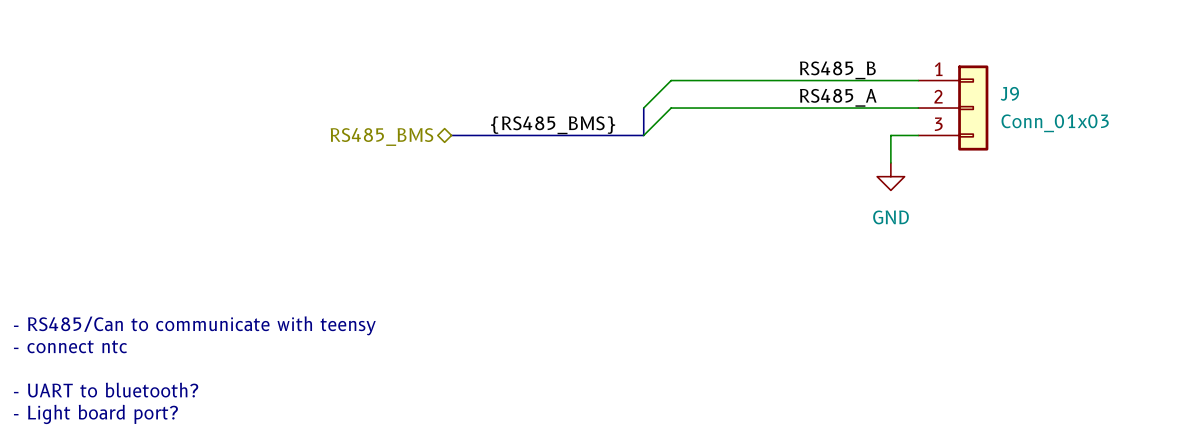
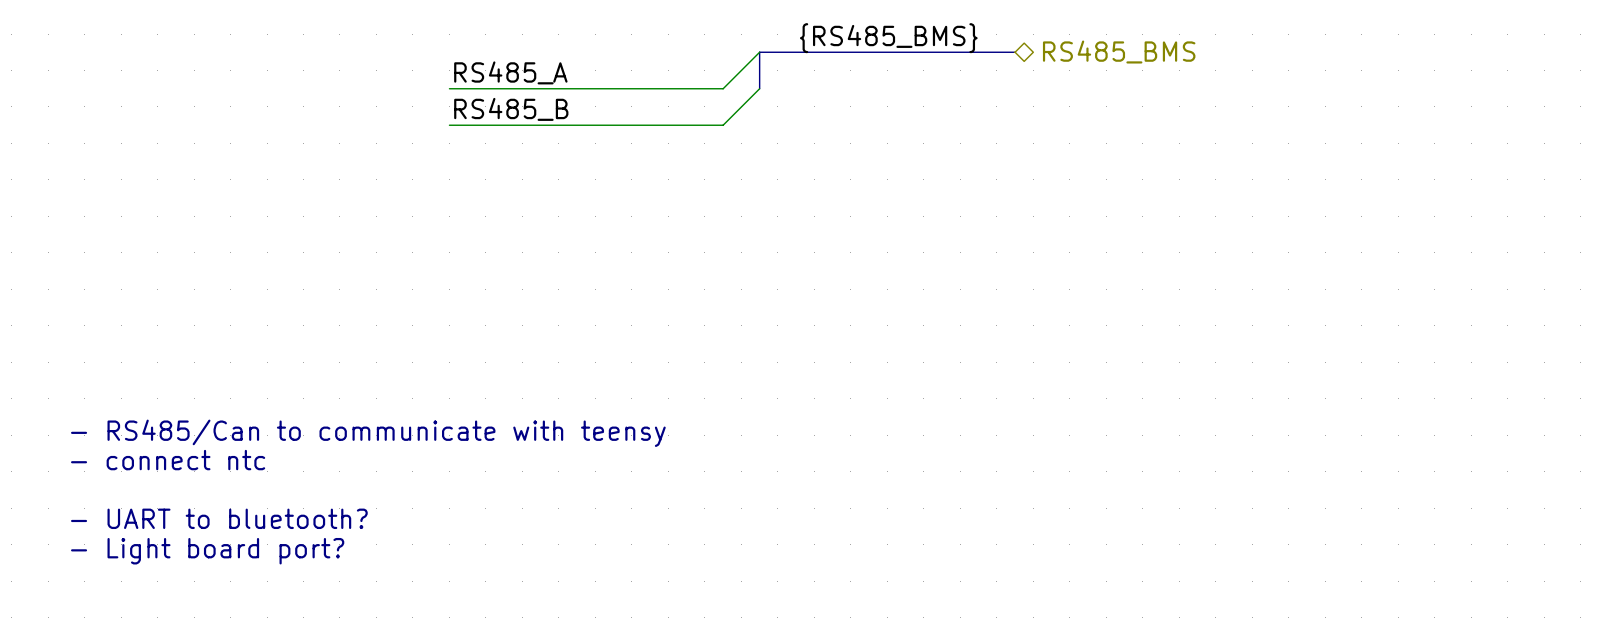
wire: none -> (759, 52) (723, 88) (449, 88)
bus: none -> (1015, 52) (759, 52) (759, 88)
hierarchical label: none -> RS485_BMS (1119, 52)
label: none -> RS485_A (510, 72)
wire: none -> (759, 88) (723, 125) (449, 125)
label: RS485_B (837, 70) -> none
wire: (918, 80) (671, 80) (643, 108) -> none
label: none -> RS485_B (511, 109)
label: RS485_A (838, 97) -> none
bus: (643, 108) (643, 135) (451, 135) -> none
wire: (918, 108) (671, 108) (643, 135) -> none
J9: Conn_01x03 (953, 108) -> none
label position: {RS485_BMS} (553, 125) -> {RS485_BMS} (888, 38)
wire: (918, 135) (890, 135) (890, 162) -> none
hierarchical label: RS485_BMS (381, 137) -> none
power symbol: GND (890, 176) -> none

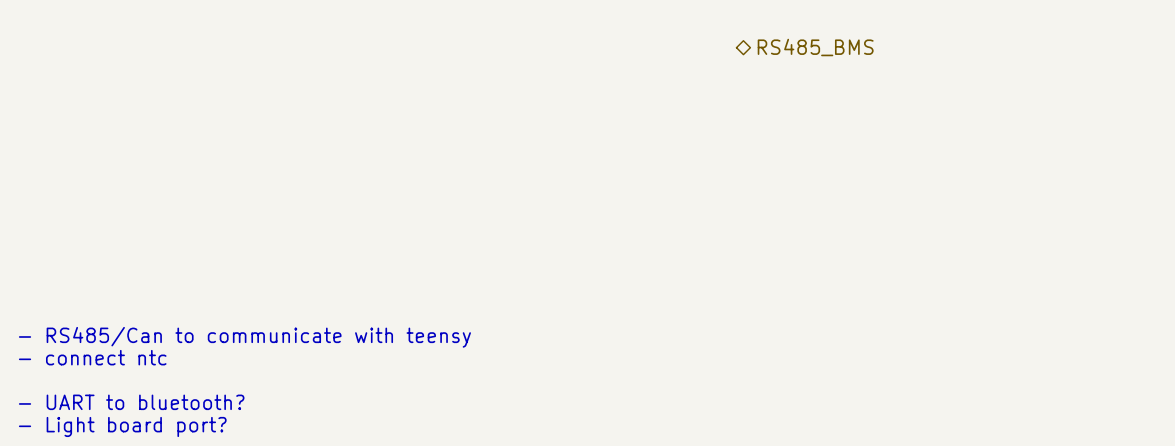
label: {RS485_BMS} (888, 38) -> none
wire: (759, 52) (723, 88) (449, 88) -> none
bus: (1015, 52) (759, 52) (759, 88) -> none
label: RS485_A (510, 72) -> none
wire: (759, 88) (723, 125) (449, 125) -> none
label: RS485_B (511, 109) -> none

